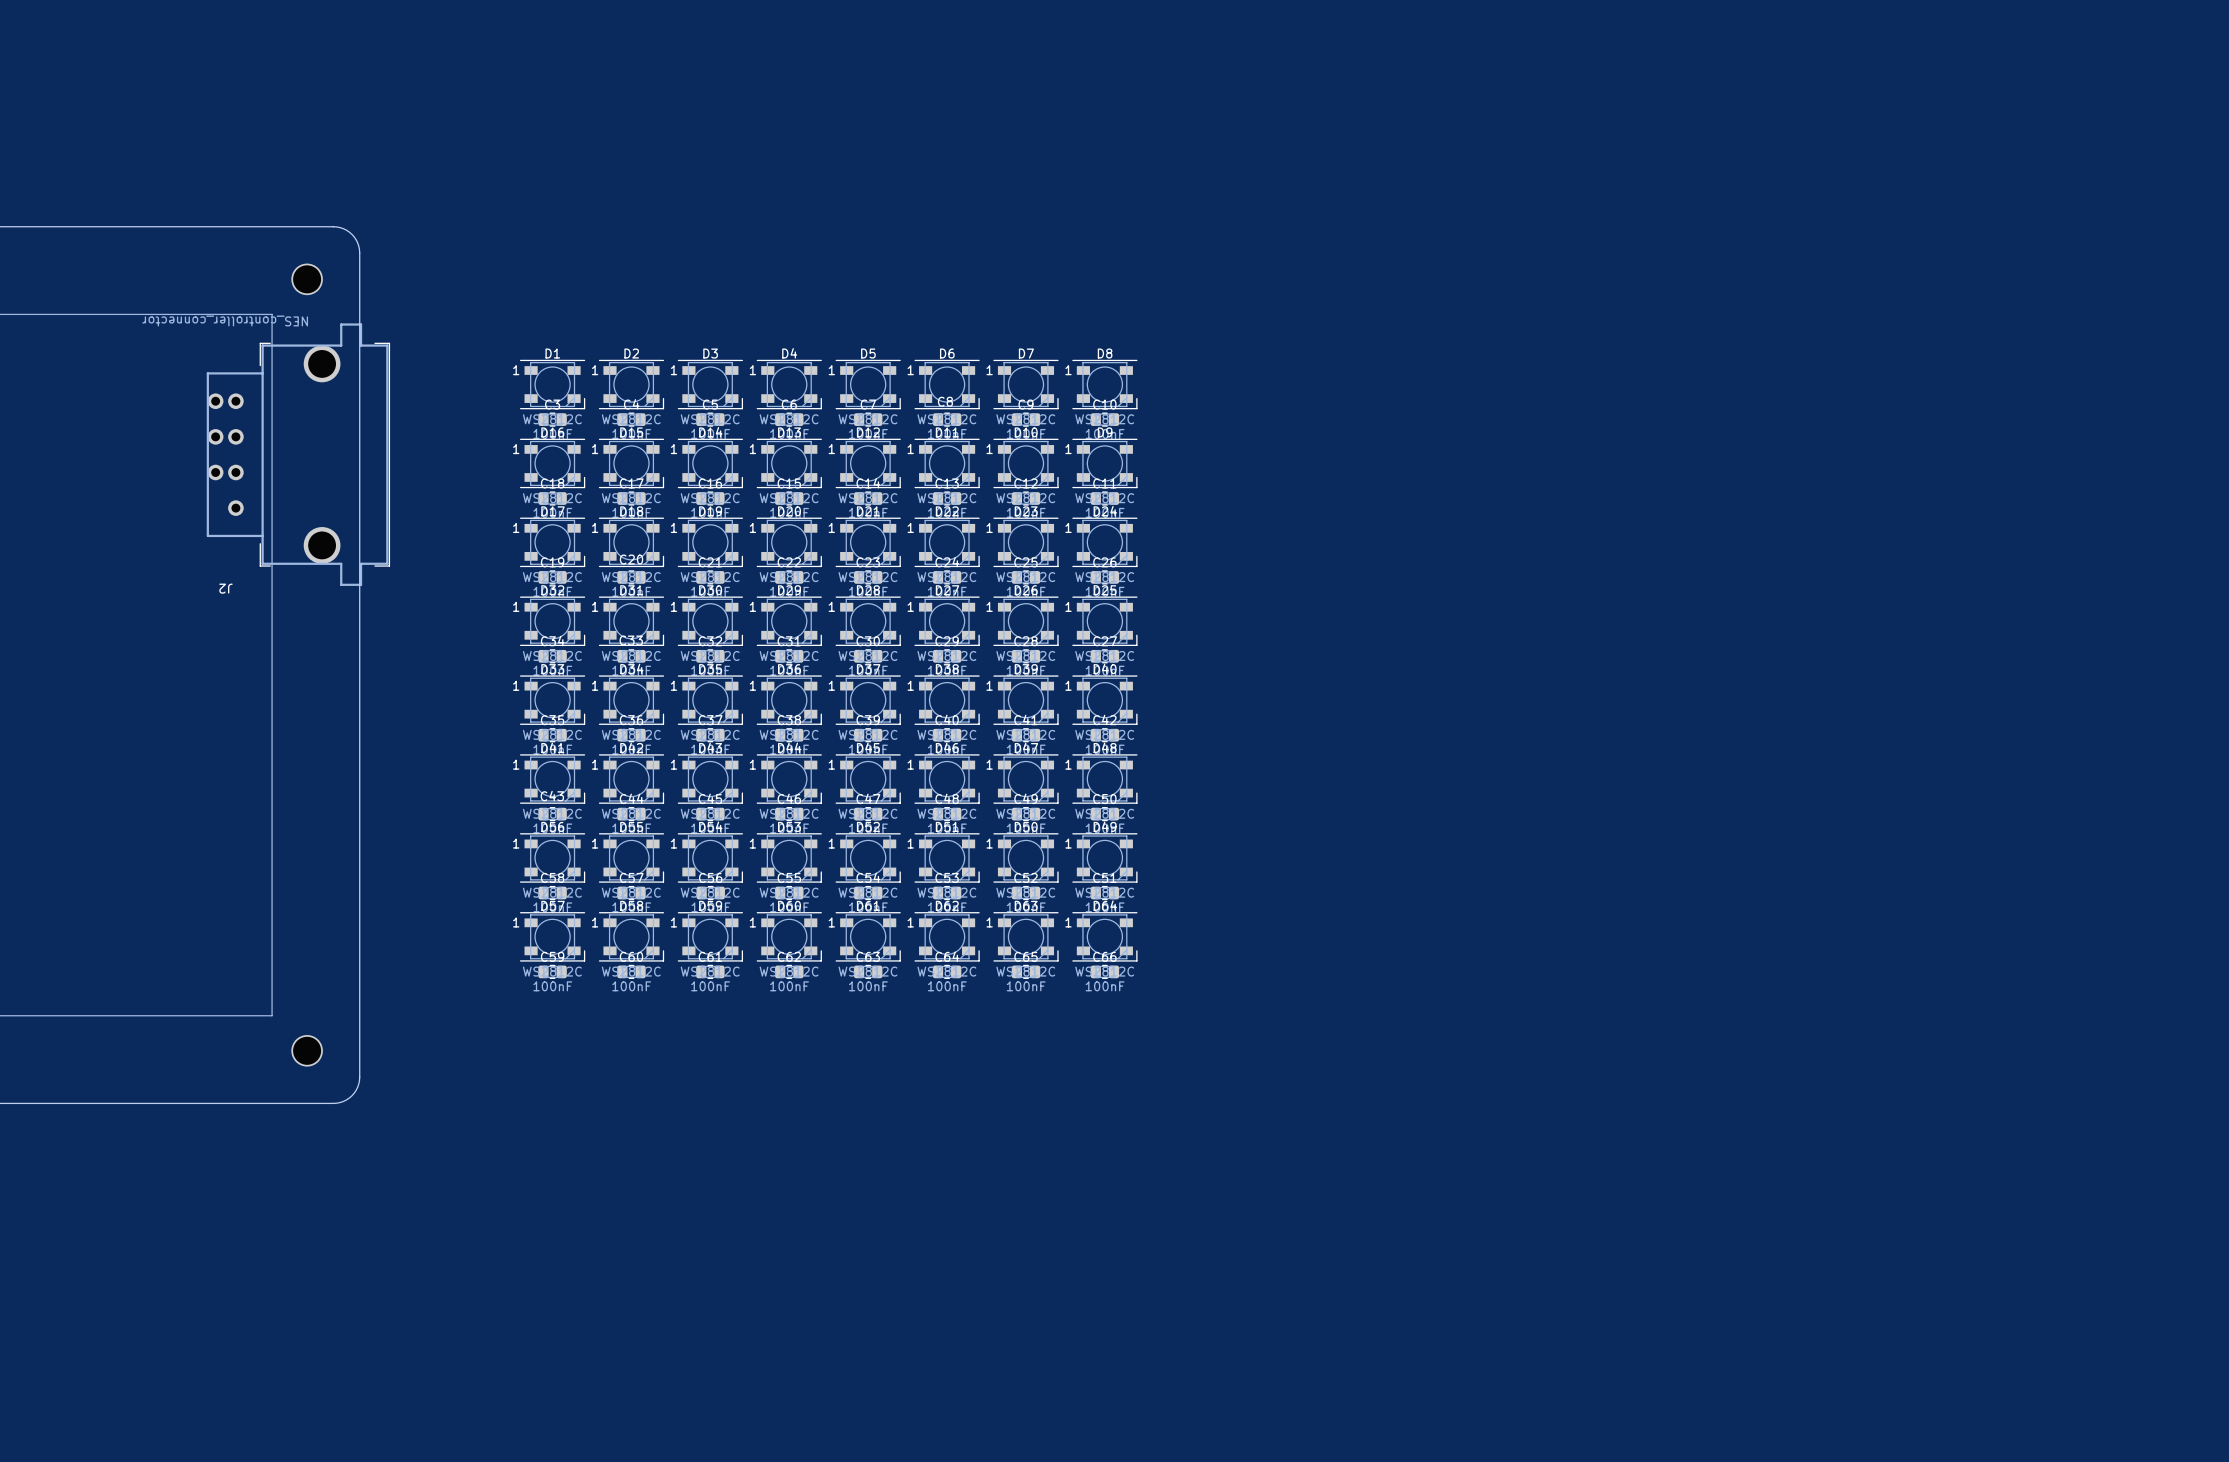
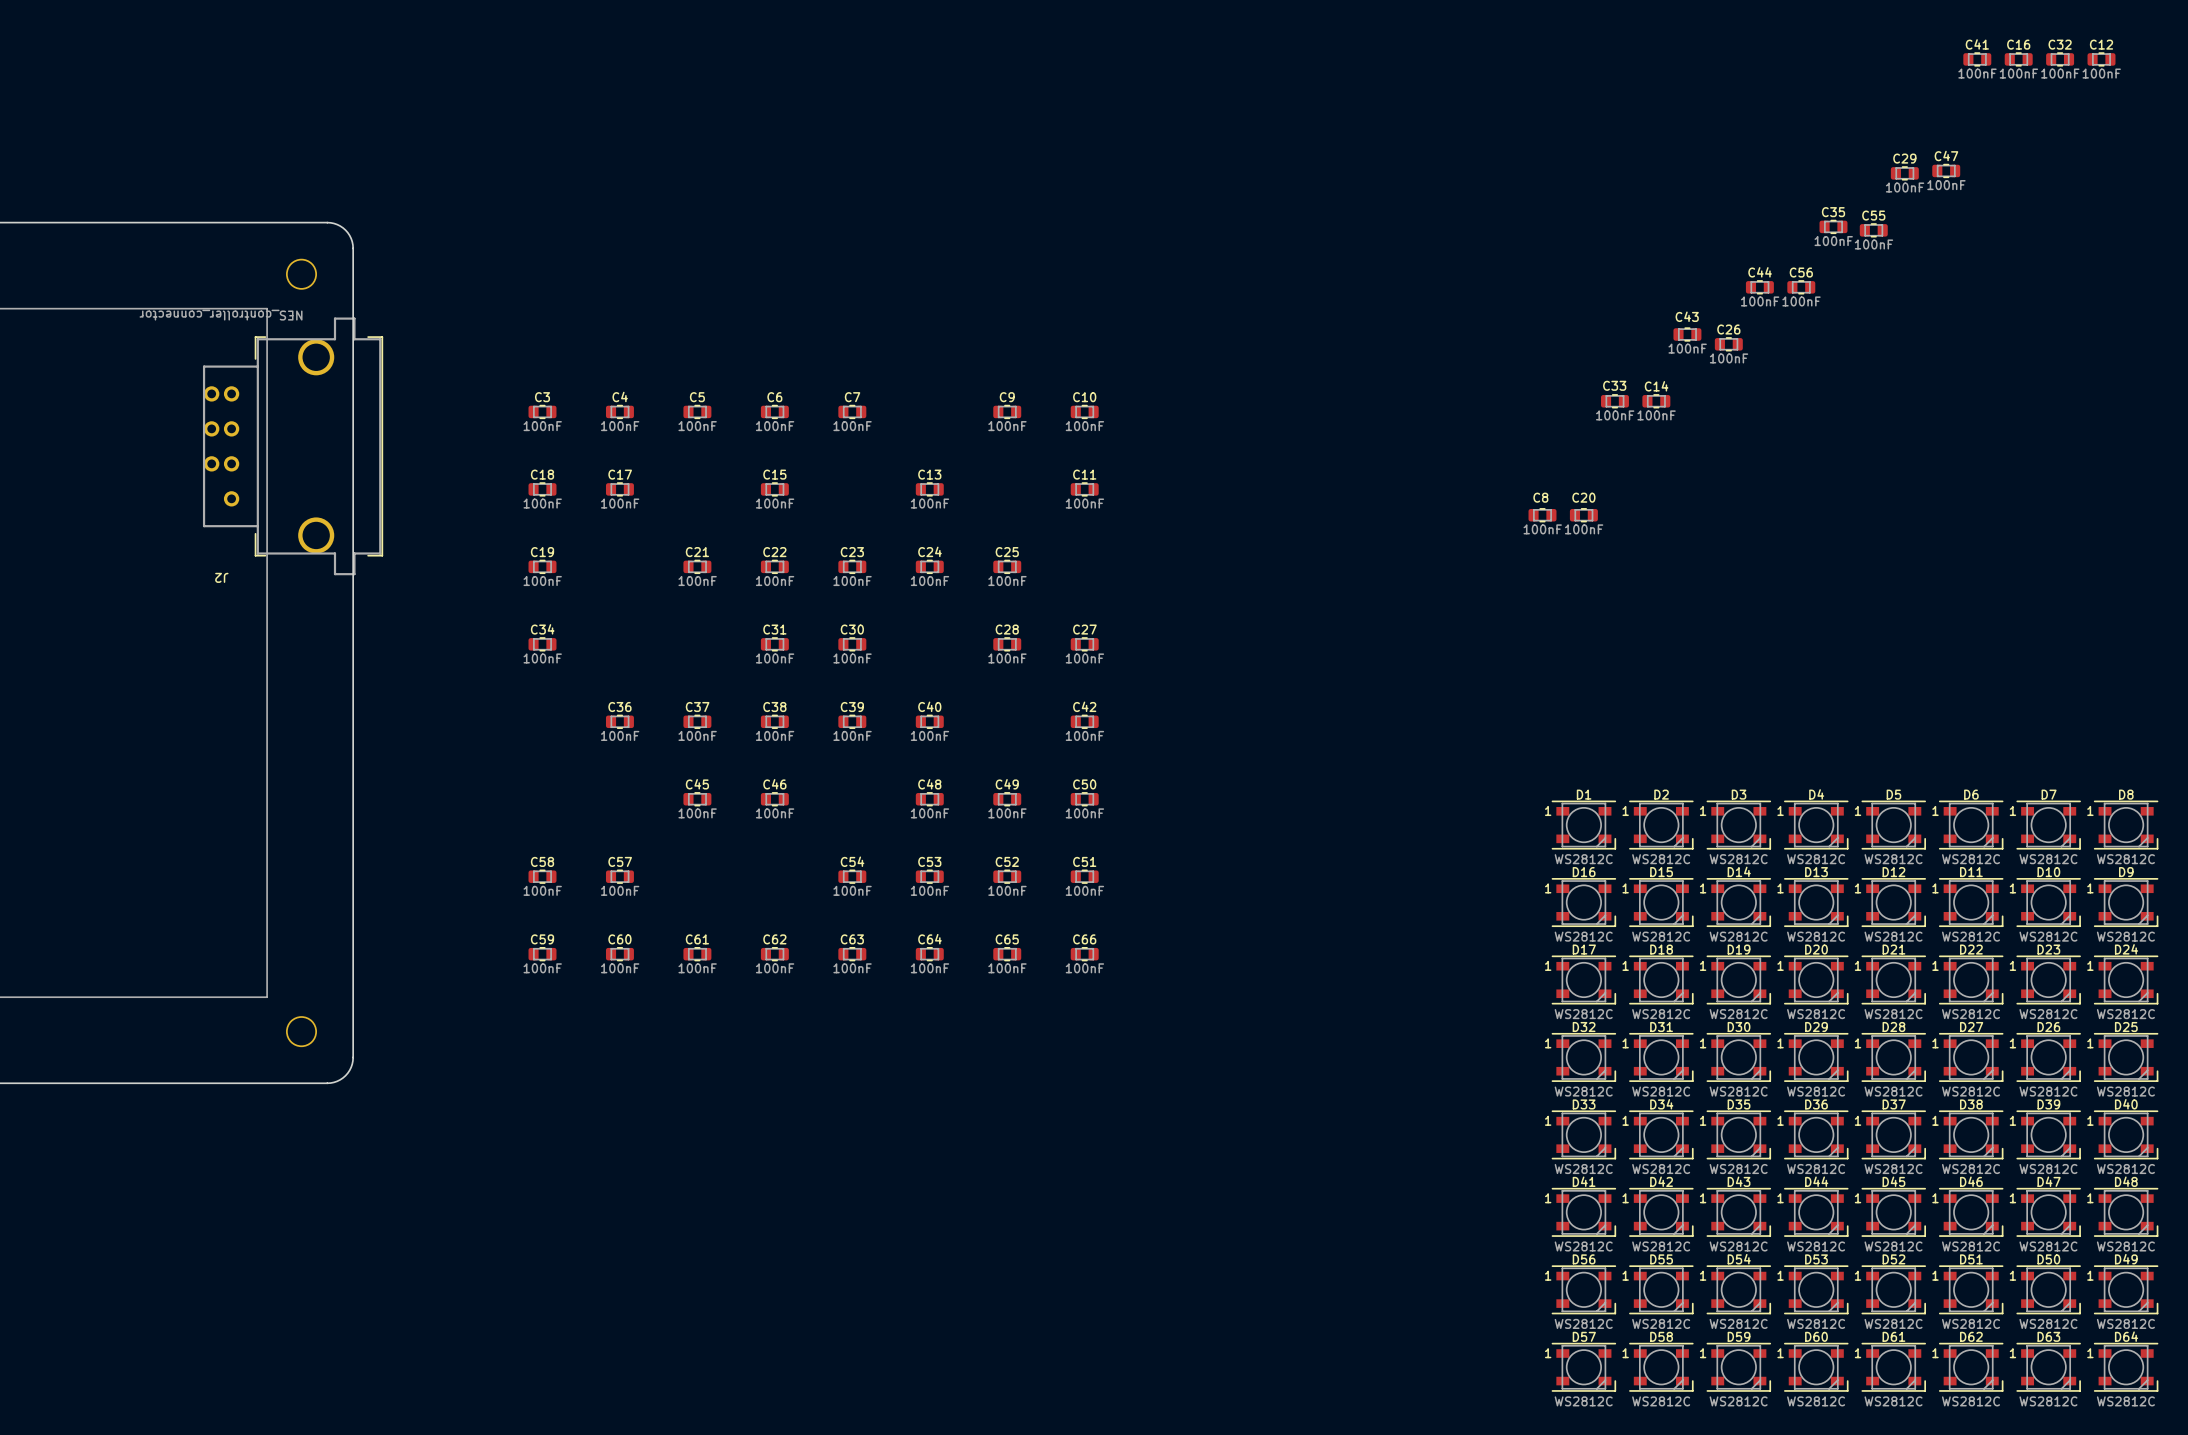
D1 position: (552, 384) -> (1583, 825)
D2 position: (631, 384) -> (1661, 825)
D3 position: (710, 384) -> (1738, 825)
D4 position: (789, 384) -> (1816, 825)
D5 position: (868, 384) -> (1893, 825)
D6 position: (947, 384) -> (1971, 825)
D7 position: (1025, 384) -> (2048, 825)
D8 position: (1104, 384) -> (2126, 825)
C8 position: (947, 419) -> (1542, 515)
D16 position: (552, 463) -> (1583, 902)
D15 position: (631, 463) -> (1661, 902)
D14 position: (710, 463) -> (1738, 902)
D13 position: (789, 463) -> (1816, 902)
D12 position: (868, 463) -> (1893, 902)
D11 position: (947, 463) -> (1971, 902)
D10 position: (1025, 463) -> (2048, 902)
D9 position: (1104, 463) -> (2126, 902)
C16 position: (710, 498) -> (2018, 59)
C14 position: (868, 498) -> (1656, 401)
C12 position: (1025, 498) -> (2101, 59)
D17 position: (552, 542) -> (1583, 979)
D18 position: (631, 542) -> (1661, 979)
D19 position: (710, 542) -> (1738, 979)
D20 position: (789, 542) -> (1816, 979)
D21 position: (868, 542) -> (1893, 979)
D22 position: (947, 542) -> (1971, 979)
D23 position: (1025, 542) -> (2048, 979)
D24 position: (1104, 542) -> (2126, 979)
C20 position: (631, 577) -> (1583, 515)
C26 position: (1104, 577) -> (1728, 344)
D32 position: (552, 621) -> (1583, 1057)
D31 position: (631, 621) -> (1661, 1057)
D30 position: (710, 621) -> (1738, 1057)
D29 position: (789, 621) -> (1816, 1057)
D28 position: (868, 621) -> (1893, 1057)
D27 position: (947, 621) -> (1971, 1057)
D26 position: (1025, 621) -> (2048, 1057)
D25 position: (1104, 621) -> (2126, 1057)
C33 position: (631, 656) -> (1614, 401)
C32 position: (710, 656) -> (2060, 59)
C29 position: (947, 656) -> (1904, 173)
D33 position: (552, 700) -> (1583, 1134)
D34 position: (631, 700) -> (1661, 1134)
D35 position: (710, 700) -> (1738, 1134)
D36 position: (789, 700) -> (1816, 1134)
D37 position: (868, 700) -> (1893, 1134)
D38 position: (947, 700) -> (1971, 1134)
D39 position: (1025, 700) -> (2048, 1134)
D40 position: (1104, 700) -> (2126, 1134)
C35 position: (552, 735) -> (1833, 226)
C41 position: (1025, 735) -> (1977, 59)
D41 position: (552, 779) -> (1583, 1212)
D42 position: (631, 779) -> (1661, 1212)
D43 position: (710, 779) -> (1738, 1212)
D44 position: (789, 779) -> (1816, 1212)
D45 position: (868, 779) -> (1893, 1212)
D46 position: (947, 779) -> (1971, 1212)
D47 position: (1025, 779) -> (2048, 1212)
D48 position: (1104, 779) -> (2126, 1212)
C43 position: (552, 814) -> (1687, 334)
C44 position: (631, 814) -> (1759, 287)
C47 position: (868, 814) -> (1946, 170)
D56 position: (552, 857) -> (1583, 1289)
D55 position: (631, 857) -> (1661, 1289)
D54 position: (710, 857) -> (1738, 1289)
D53 position: (789, 857) -> (1816, 1289)
D52 position: (868, 857) -> (1893, 1289)
D51 position: (947, 857) -> (1971, 1289)
D50 position: (1025, 857) -> (2048, 1289)
D49 position: (1104, 857) -> (2126, 1289)
C56 position: (710, 893) -> (1801, 287)
C55 position: (789, 893) -> (1873, 230)
D57 position: (552, 936) -> (1583, 1367)
D58 position: (631, 936) -> (1661, 1367)
D59 position: (710, 936) -> (1738, 1367)
D60 position: (789, 936) -> (1816, 1367)
D61 position: (868, 936) -> (1893, 1367)
D62 position: (947, 936) -> (1971, 1367)
D63 position: (1025, 936) -> (2048, 1367)
D64 position: (1104, 936) -> (2126, 1367)

